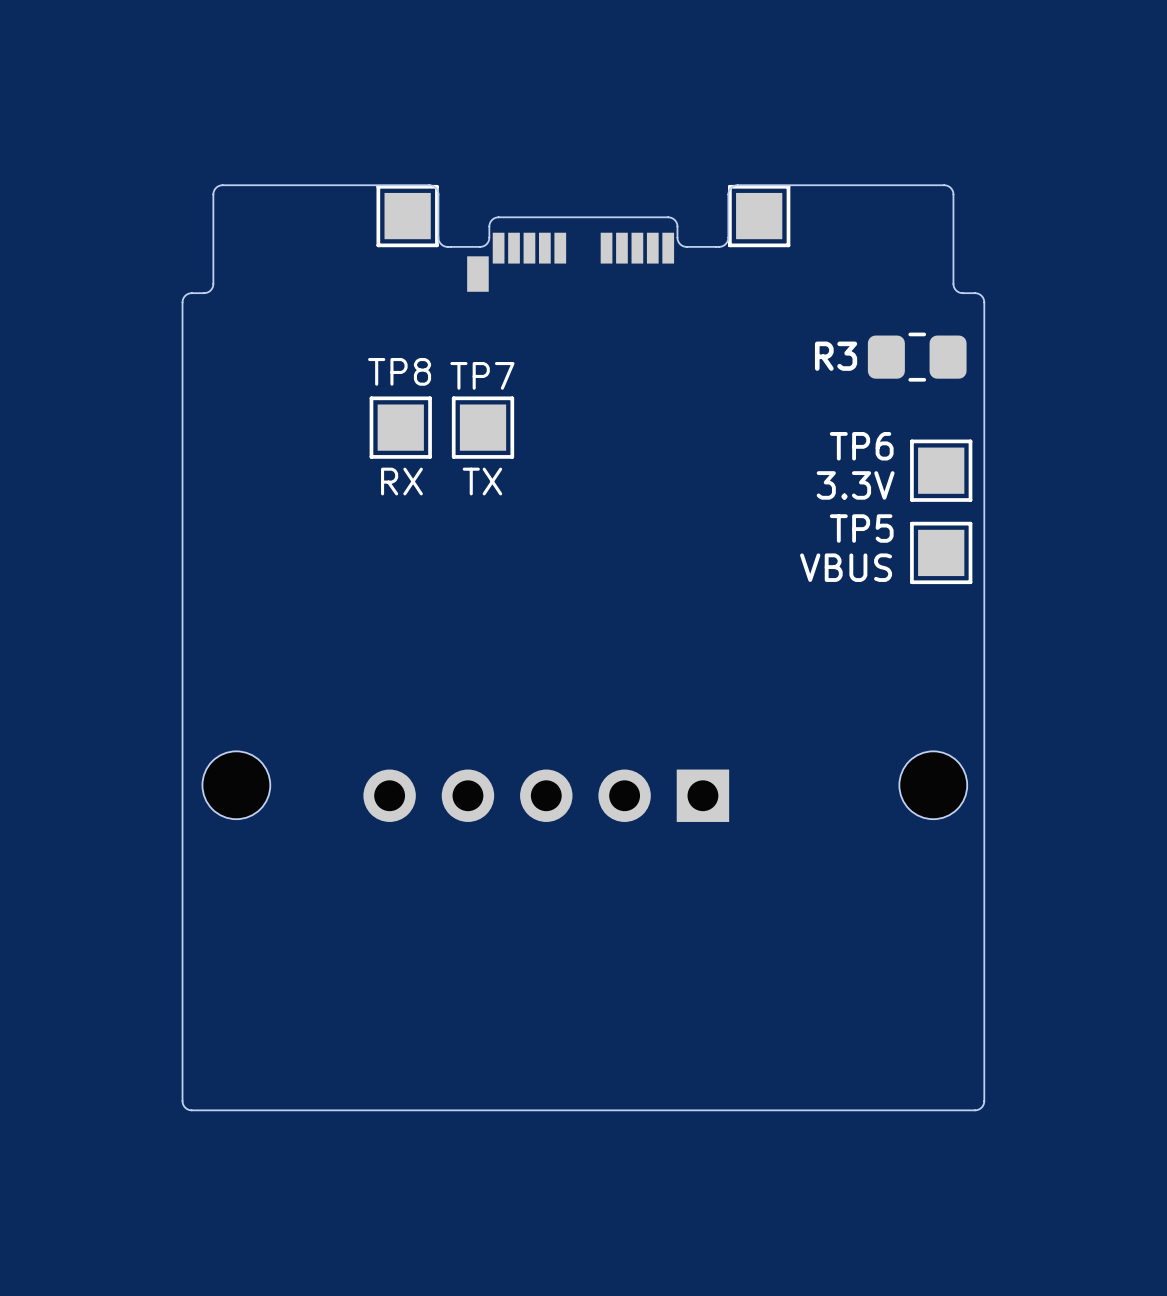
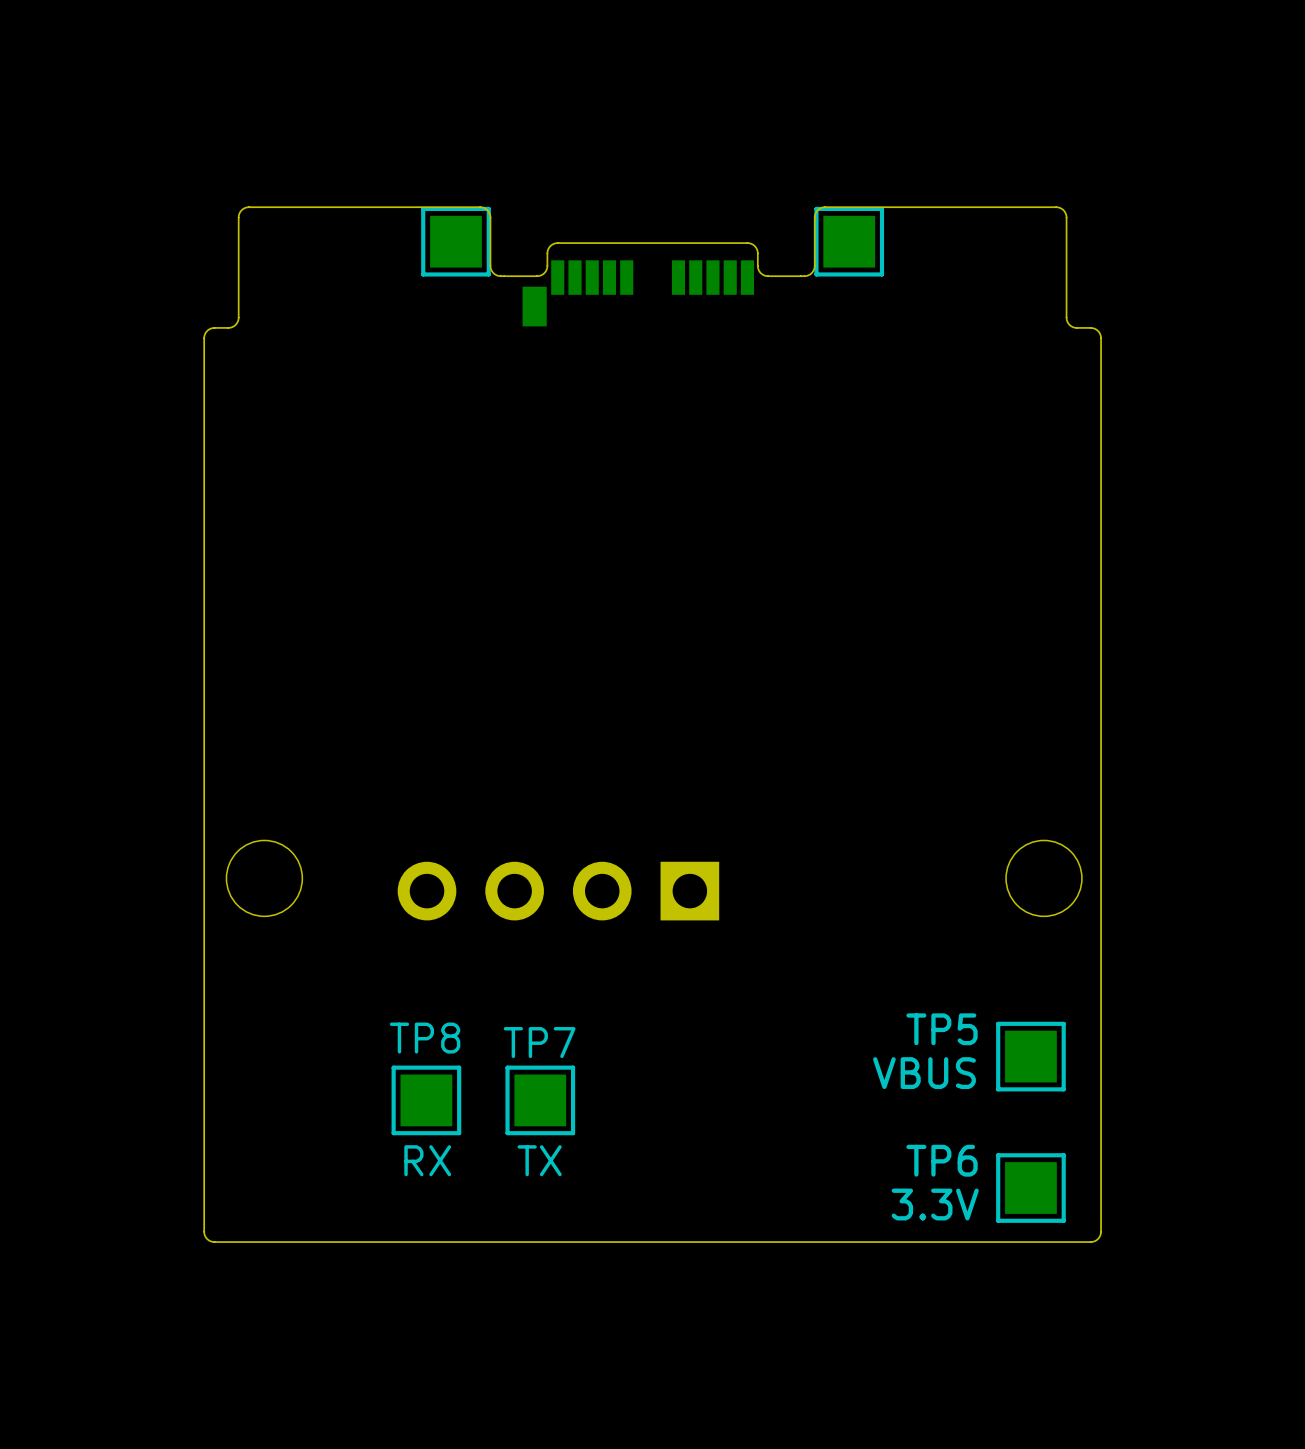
R3: (917, 357) -> none
TP8 position: (400, 427) -> (426, 1100)
TP7 position: (483, 427) -> (540, 1100)
TP6 position: (941, 470) -> (1030, 1188)
TP5 position: (941, 552) -> (1030, 1056)
part: (546, 795) -> none
part: none -> (558, 891)

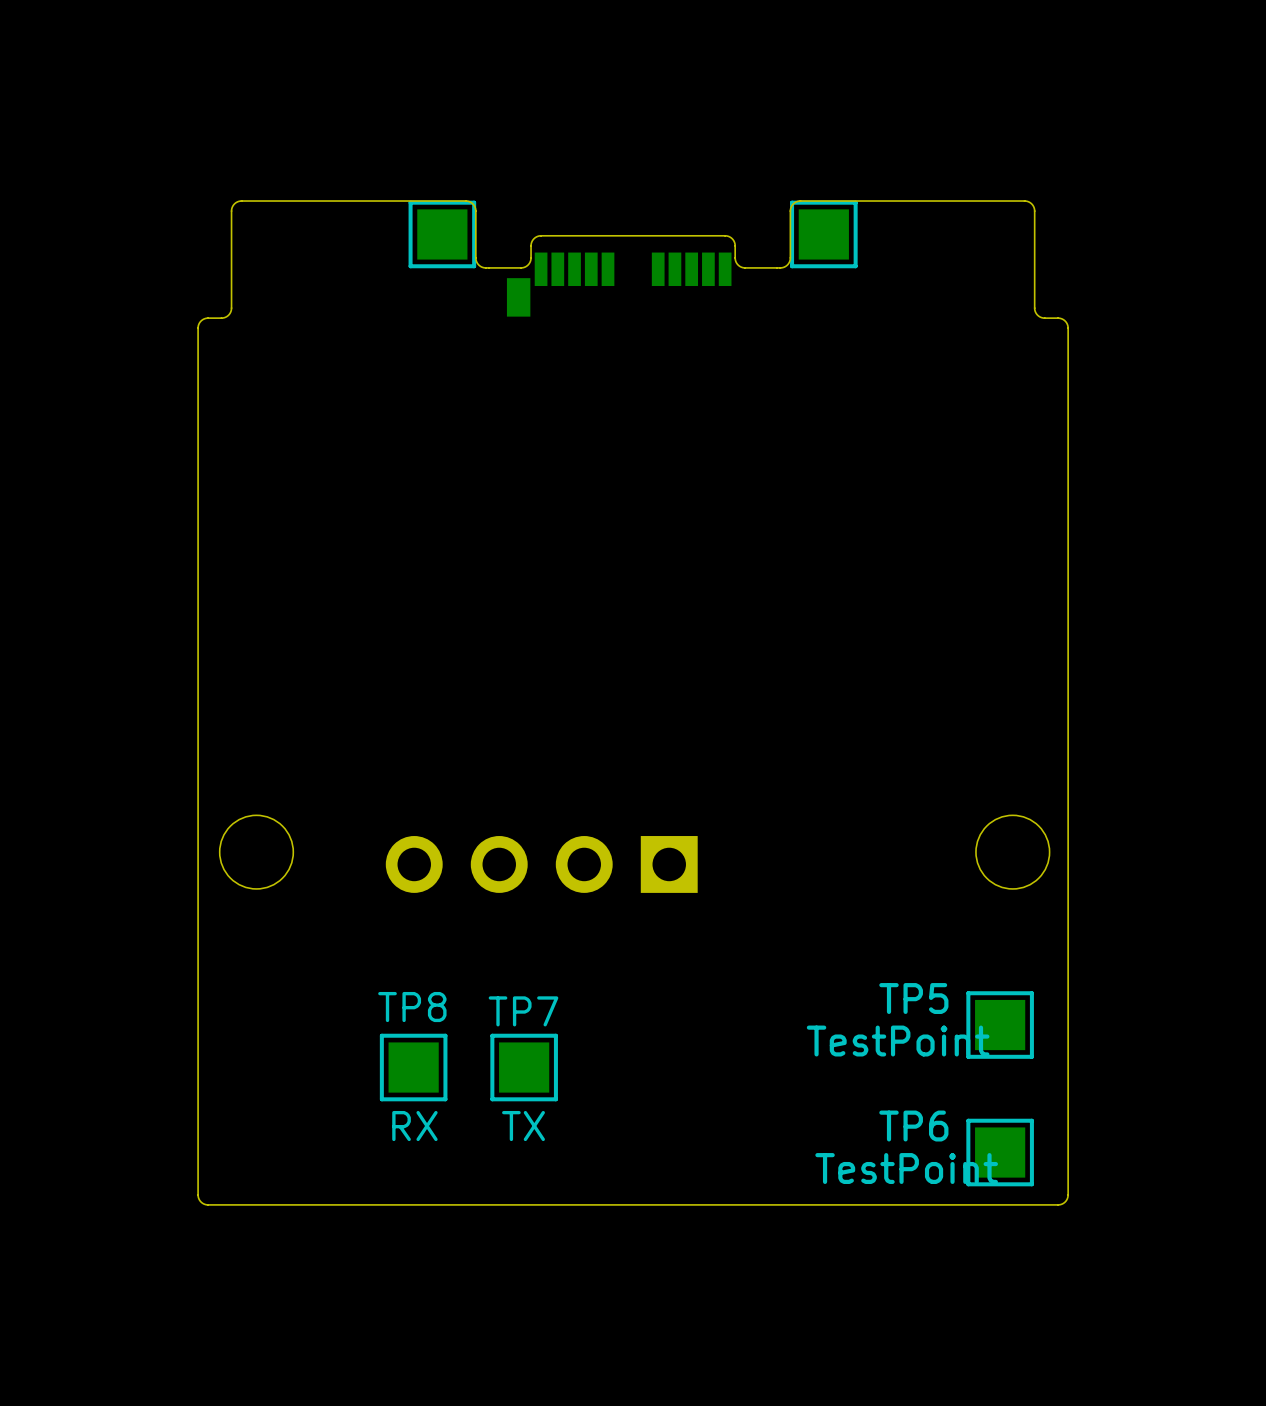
TP5 value: VBUS (924, 1073) -> TestPoint (898, 1041)
TP6 value: 3.3V (935, 1204) -> TestPoint (906, 1168)

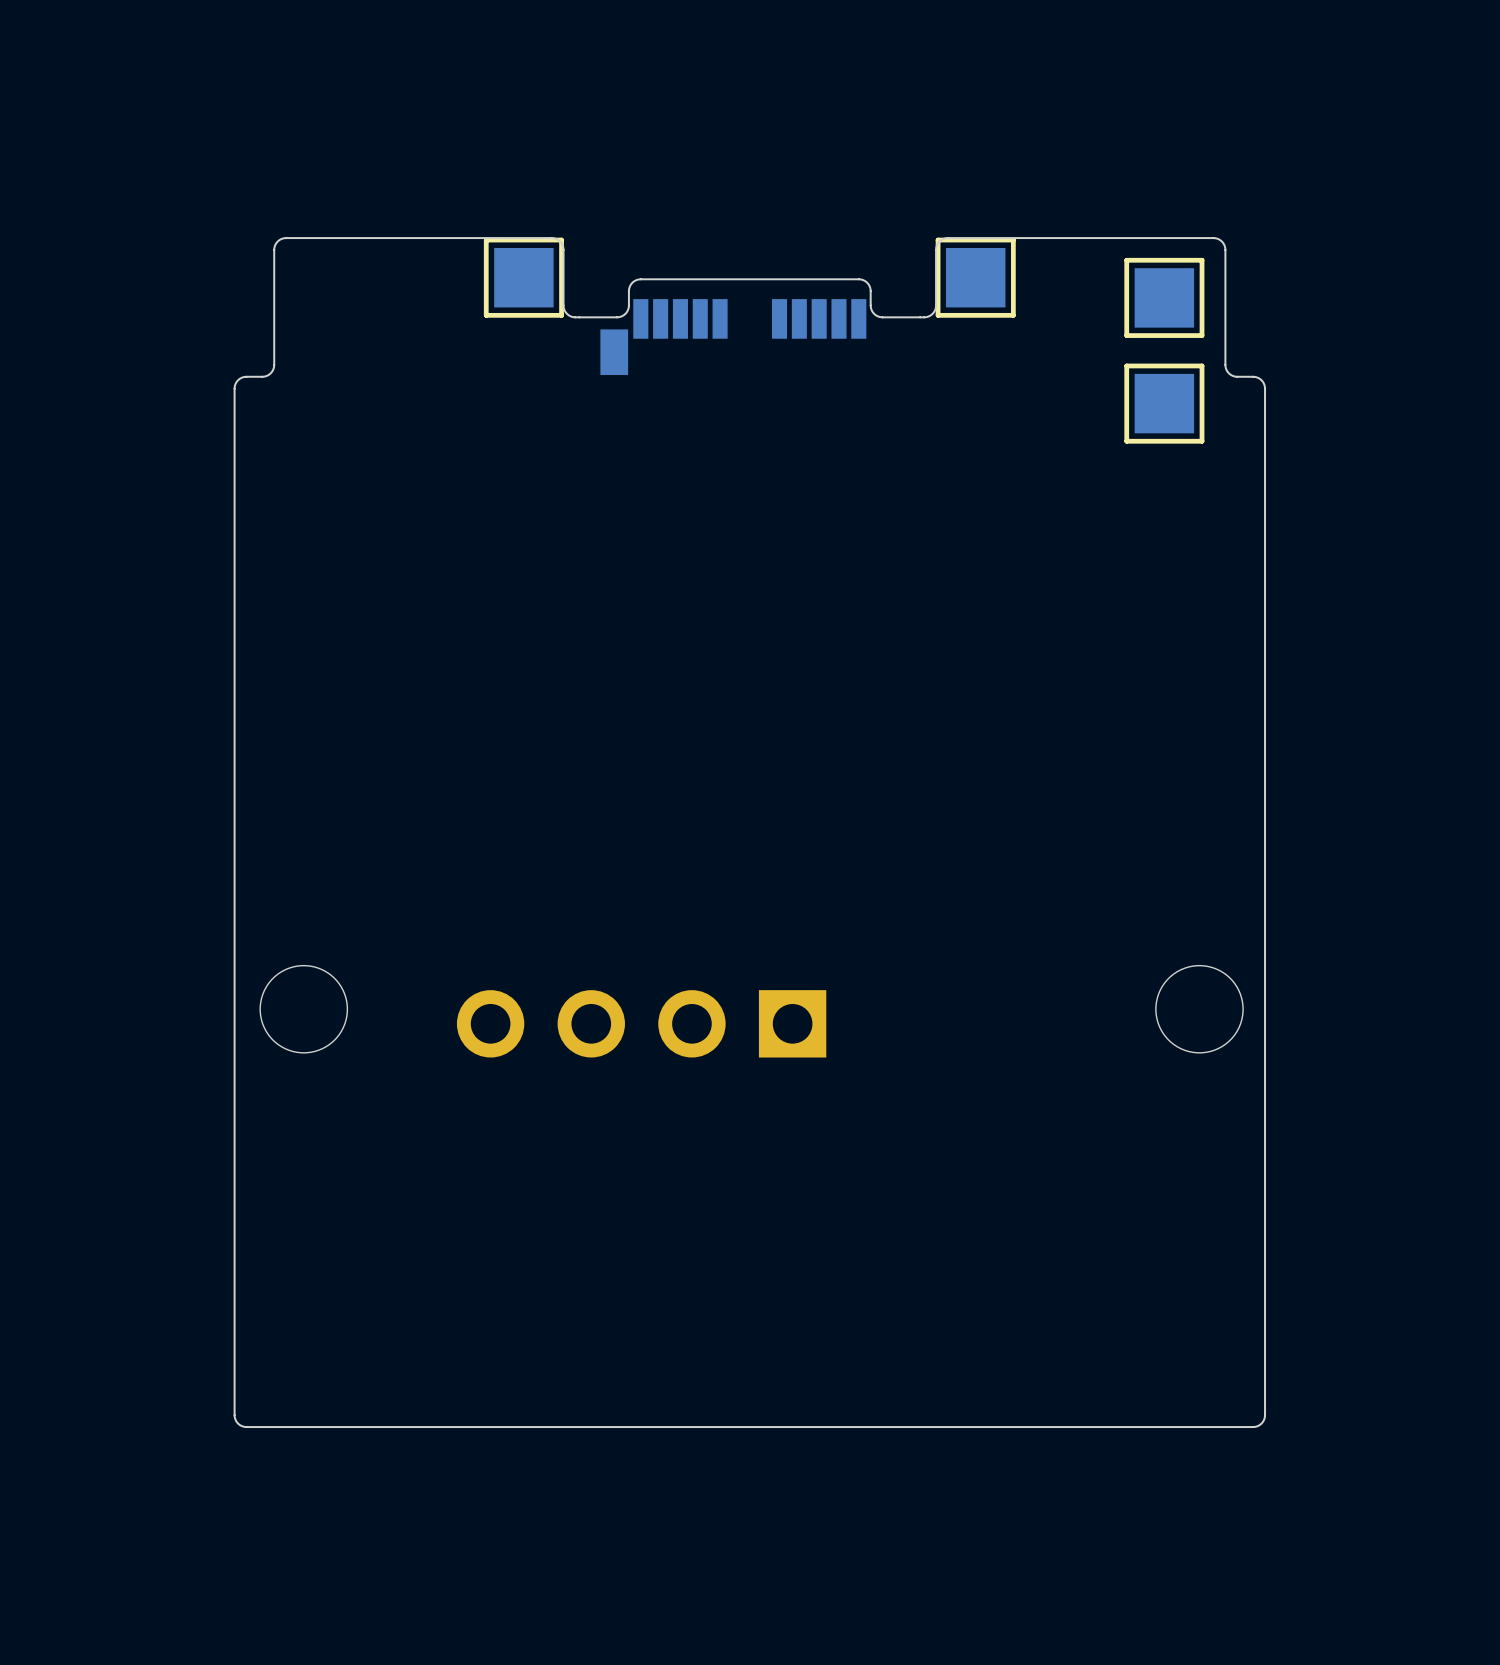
part: none -> (1164, 297)
part: none -> (1164, 403)
TP5: TestPoint (1000, 1025) -> none
TP8: RX (413, 1067) -> none
TP7: TX (524, 1067) -> none
TP6: TestPoint (1000, 1152) -> none

